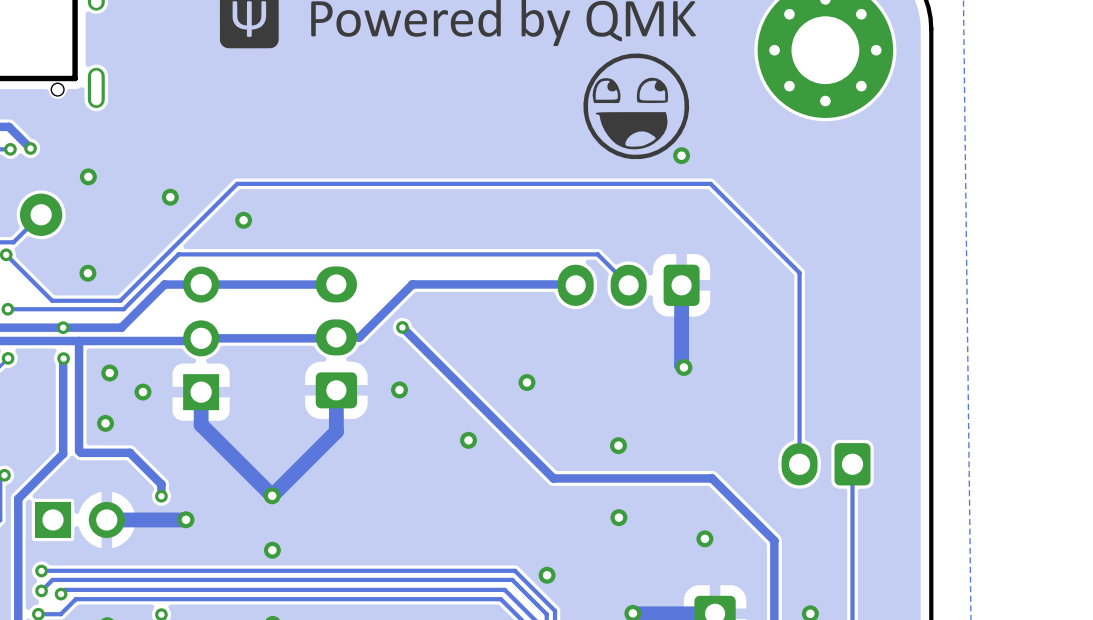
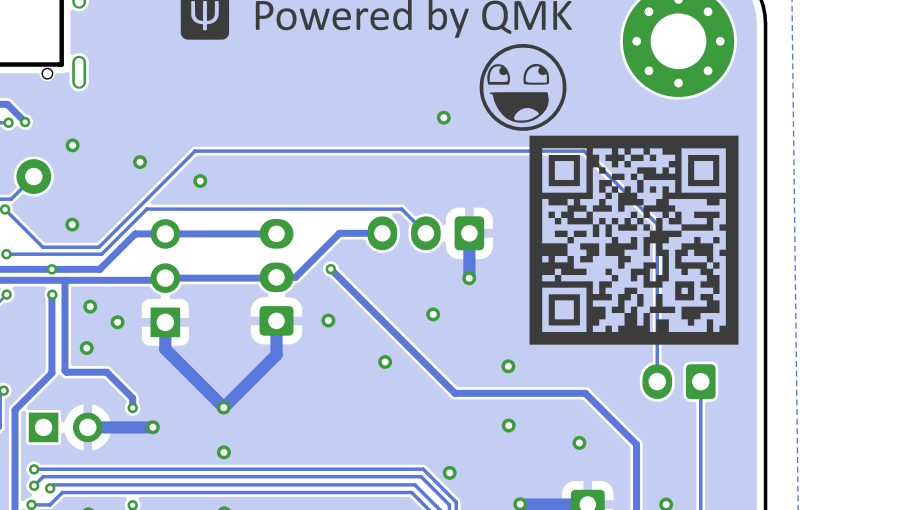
via: none -> (443, 117)
via: (681, 155) -> none
drawing: none -> [529, 135, 739, 345]
track: (488, 254) (597, 254) (628, 285) -> (401, 209) (425, 233)
track: none -> (469, 233) (469, 278)
track: (412, 284) (575, 285) -> (339, 233) (382, 233)
part position: (628, 285) -> (425, 233)
track: (681, 285) (681, 365) (683, 367) -> none
via: none -> (469, 278)
via: (683, 367) -> none

